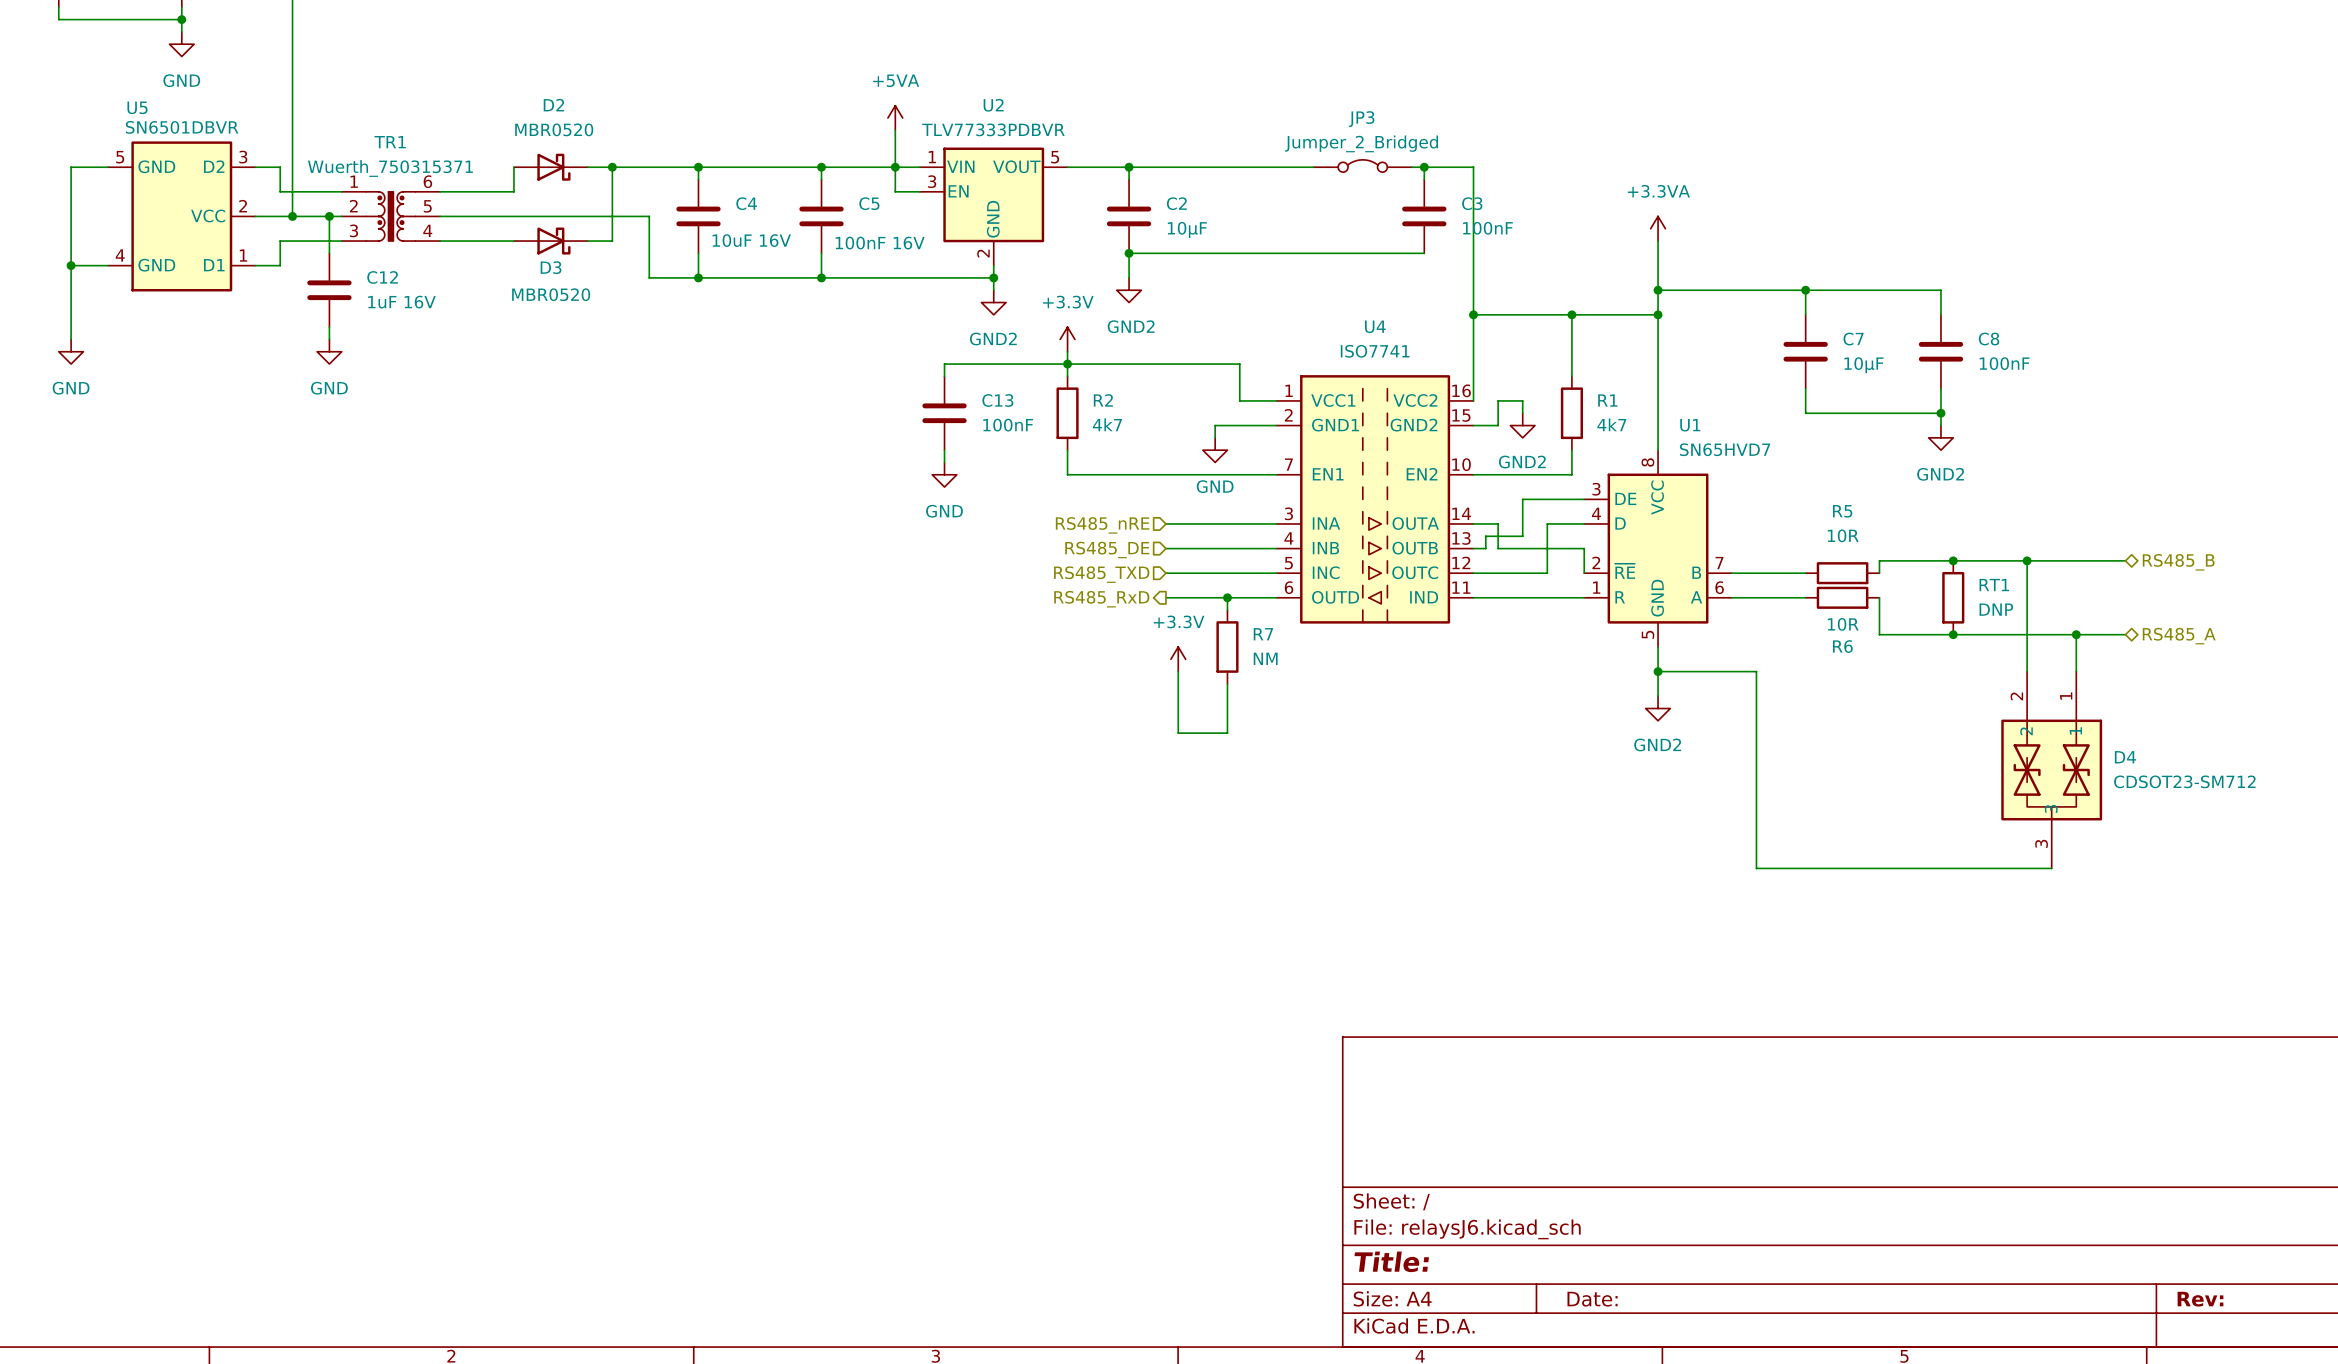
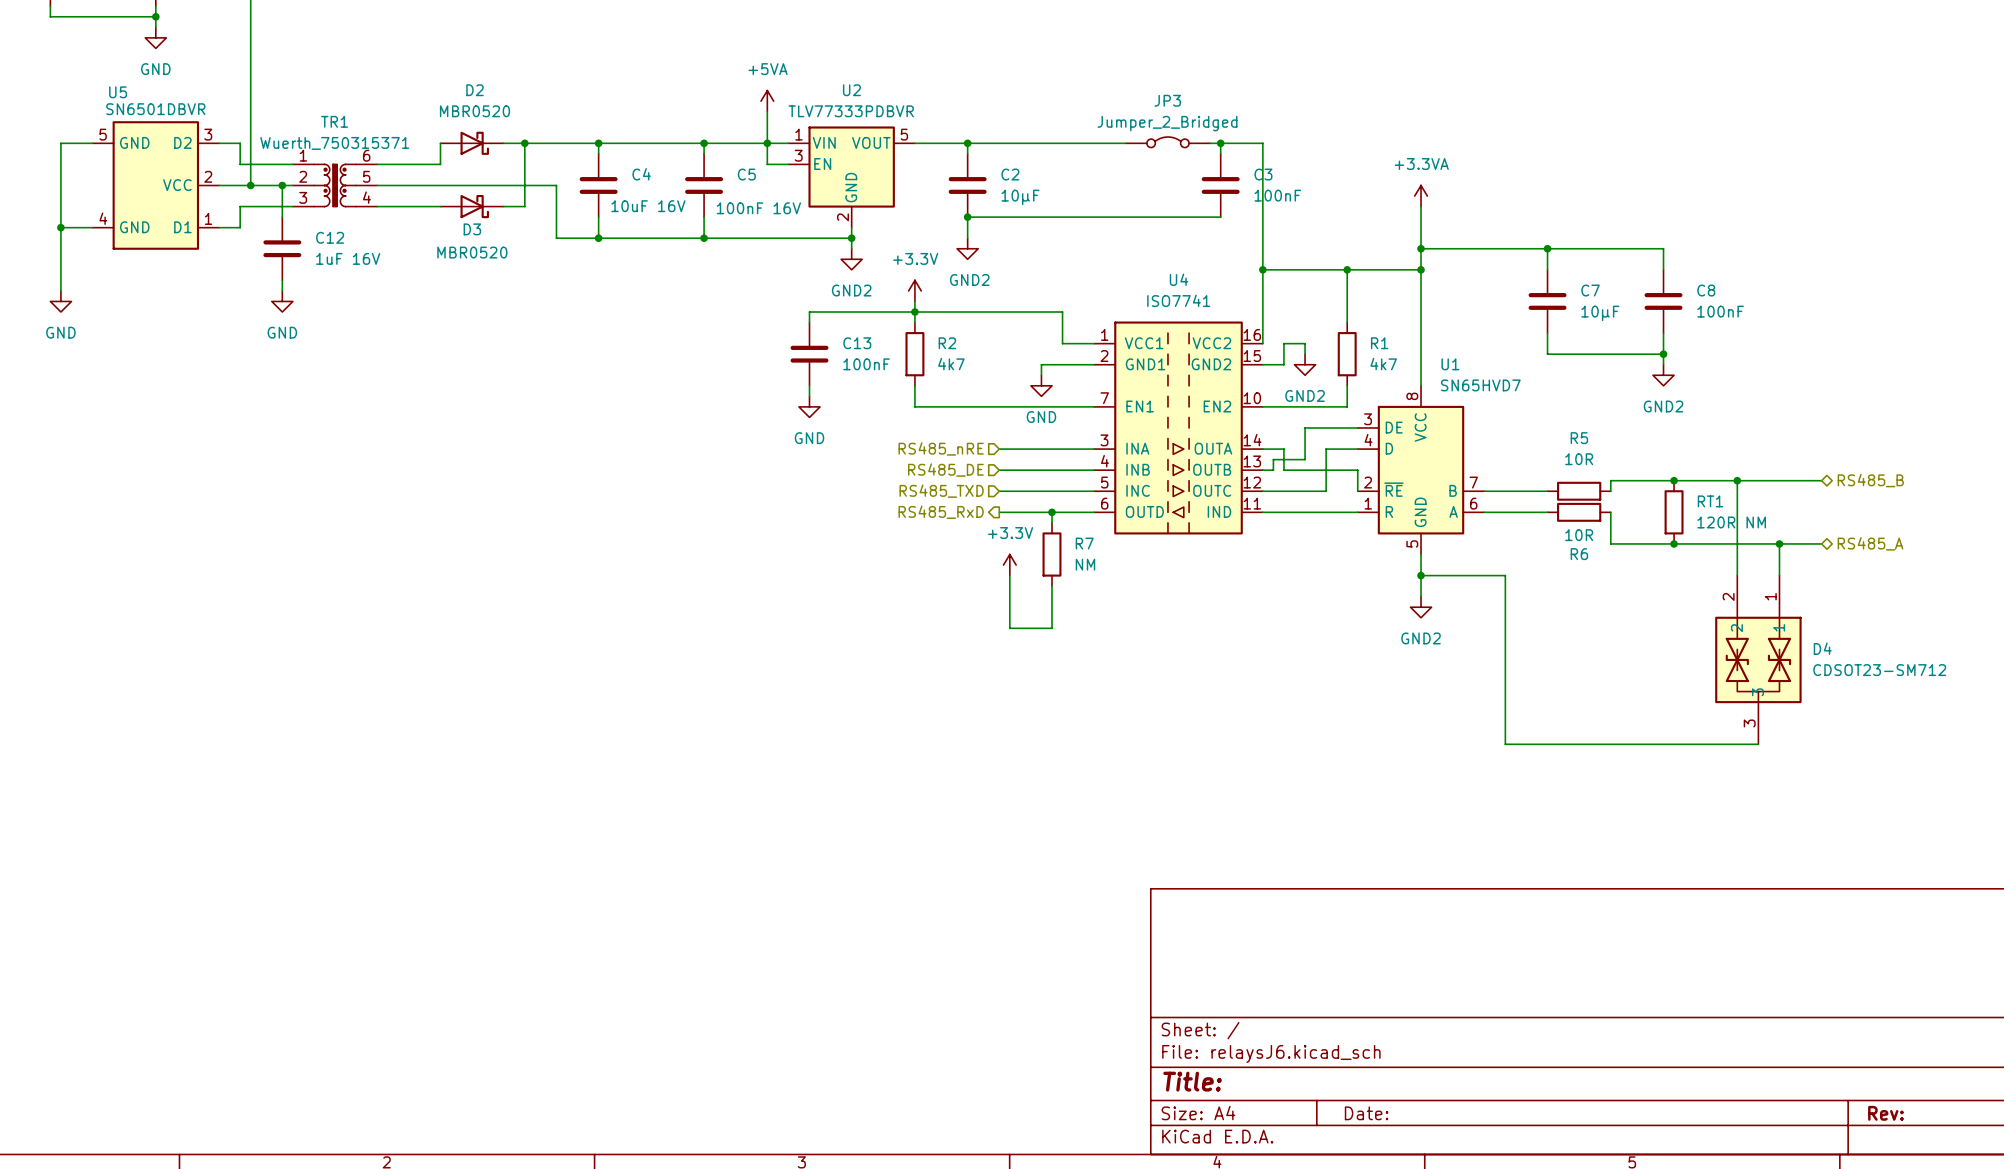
RT1 value: DNP (1996, 609) -> 120R NM (1731, 522)

